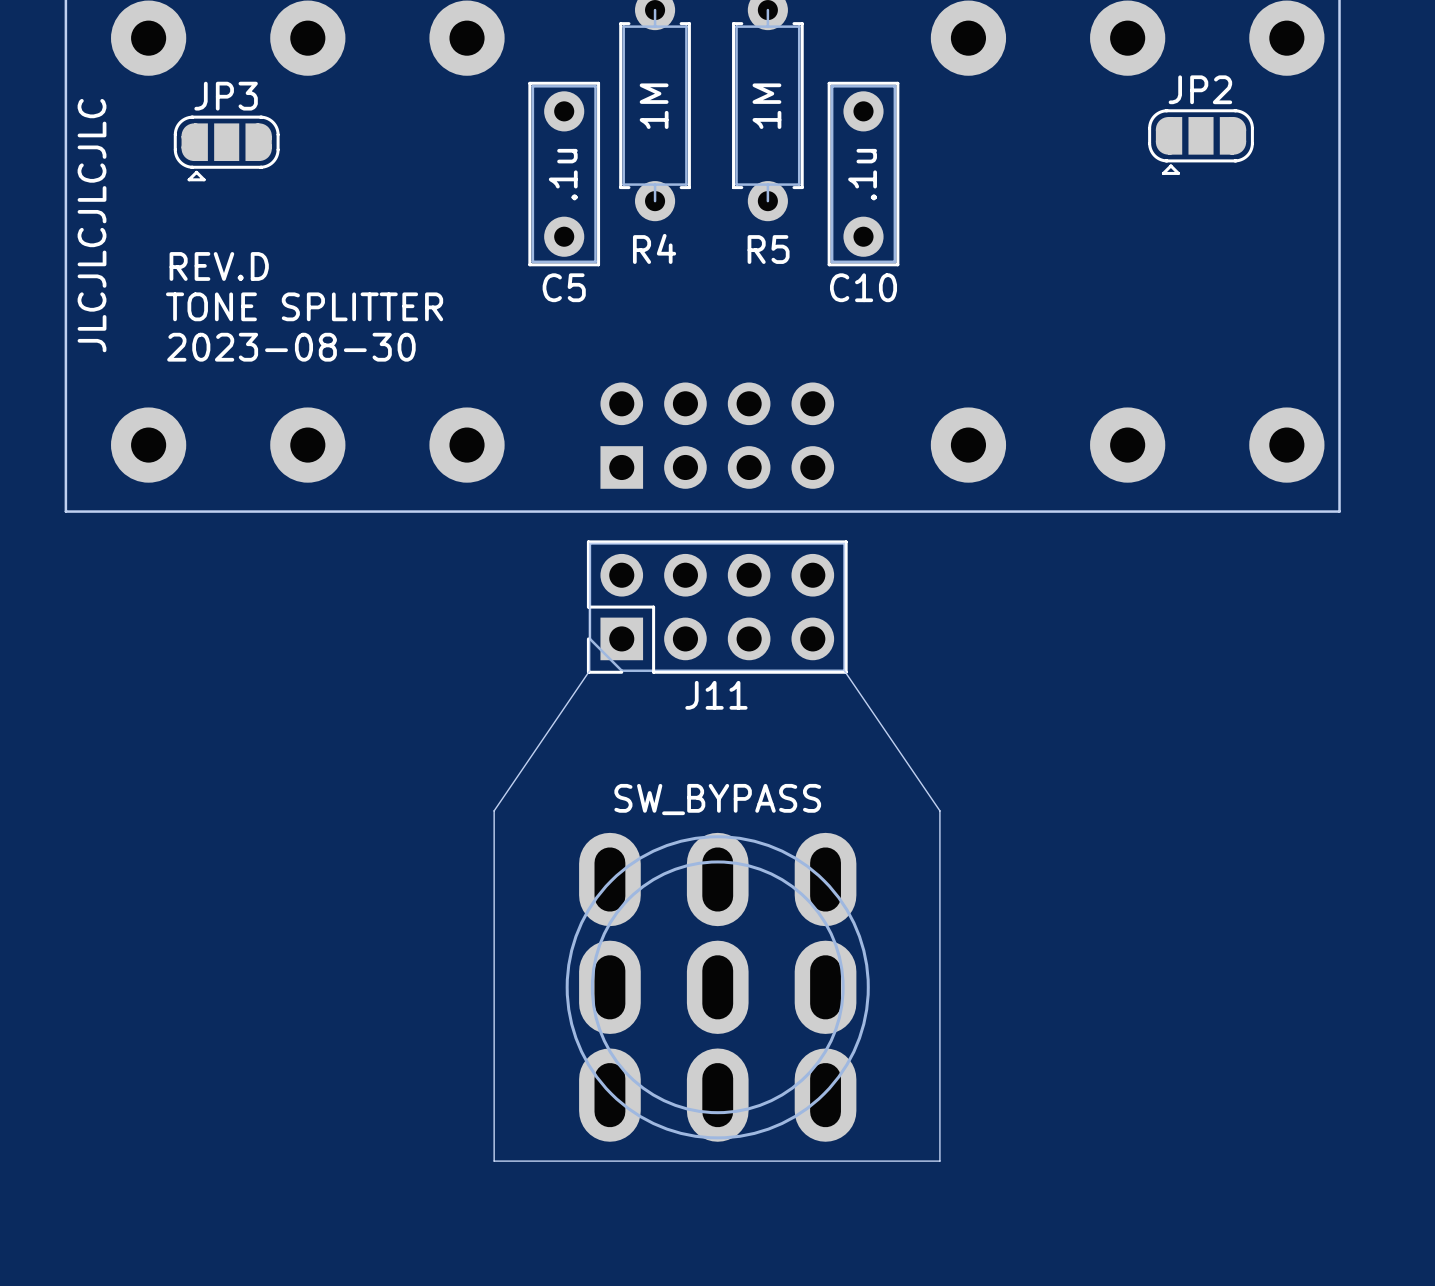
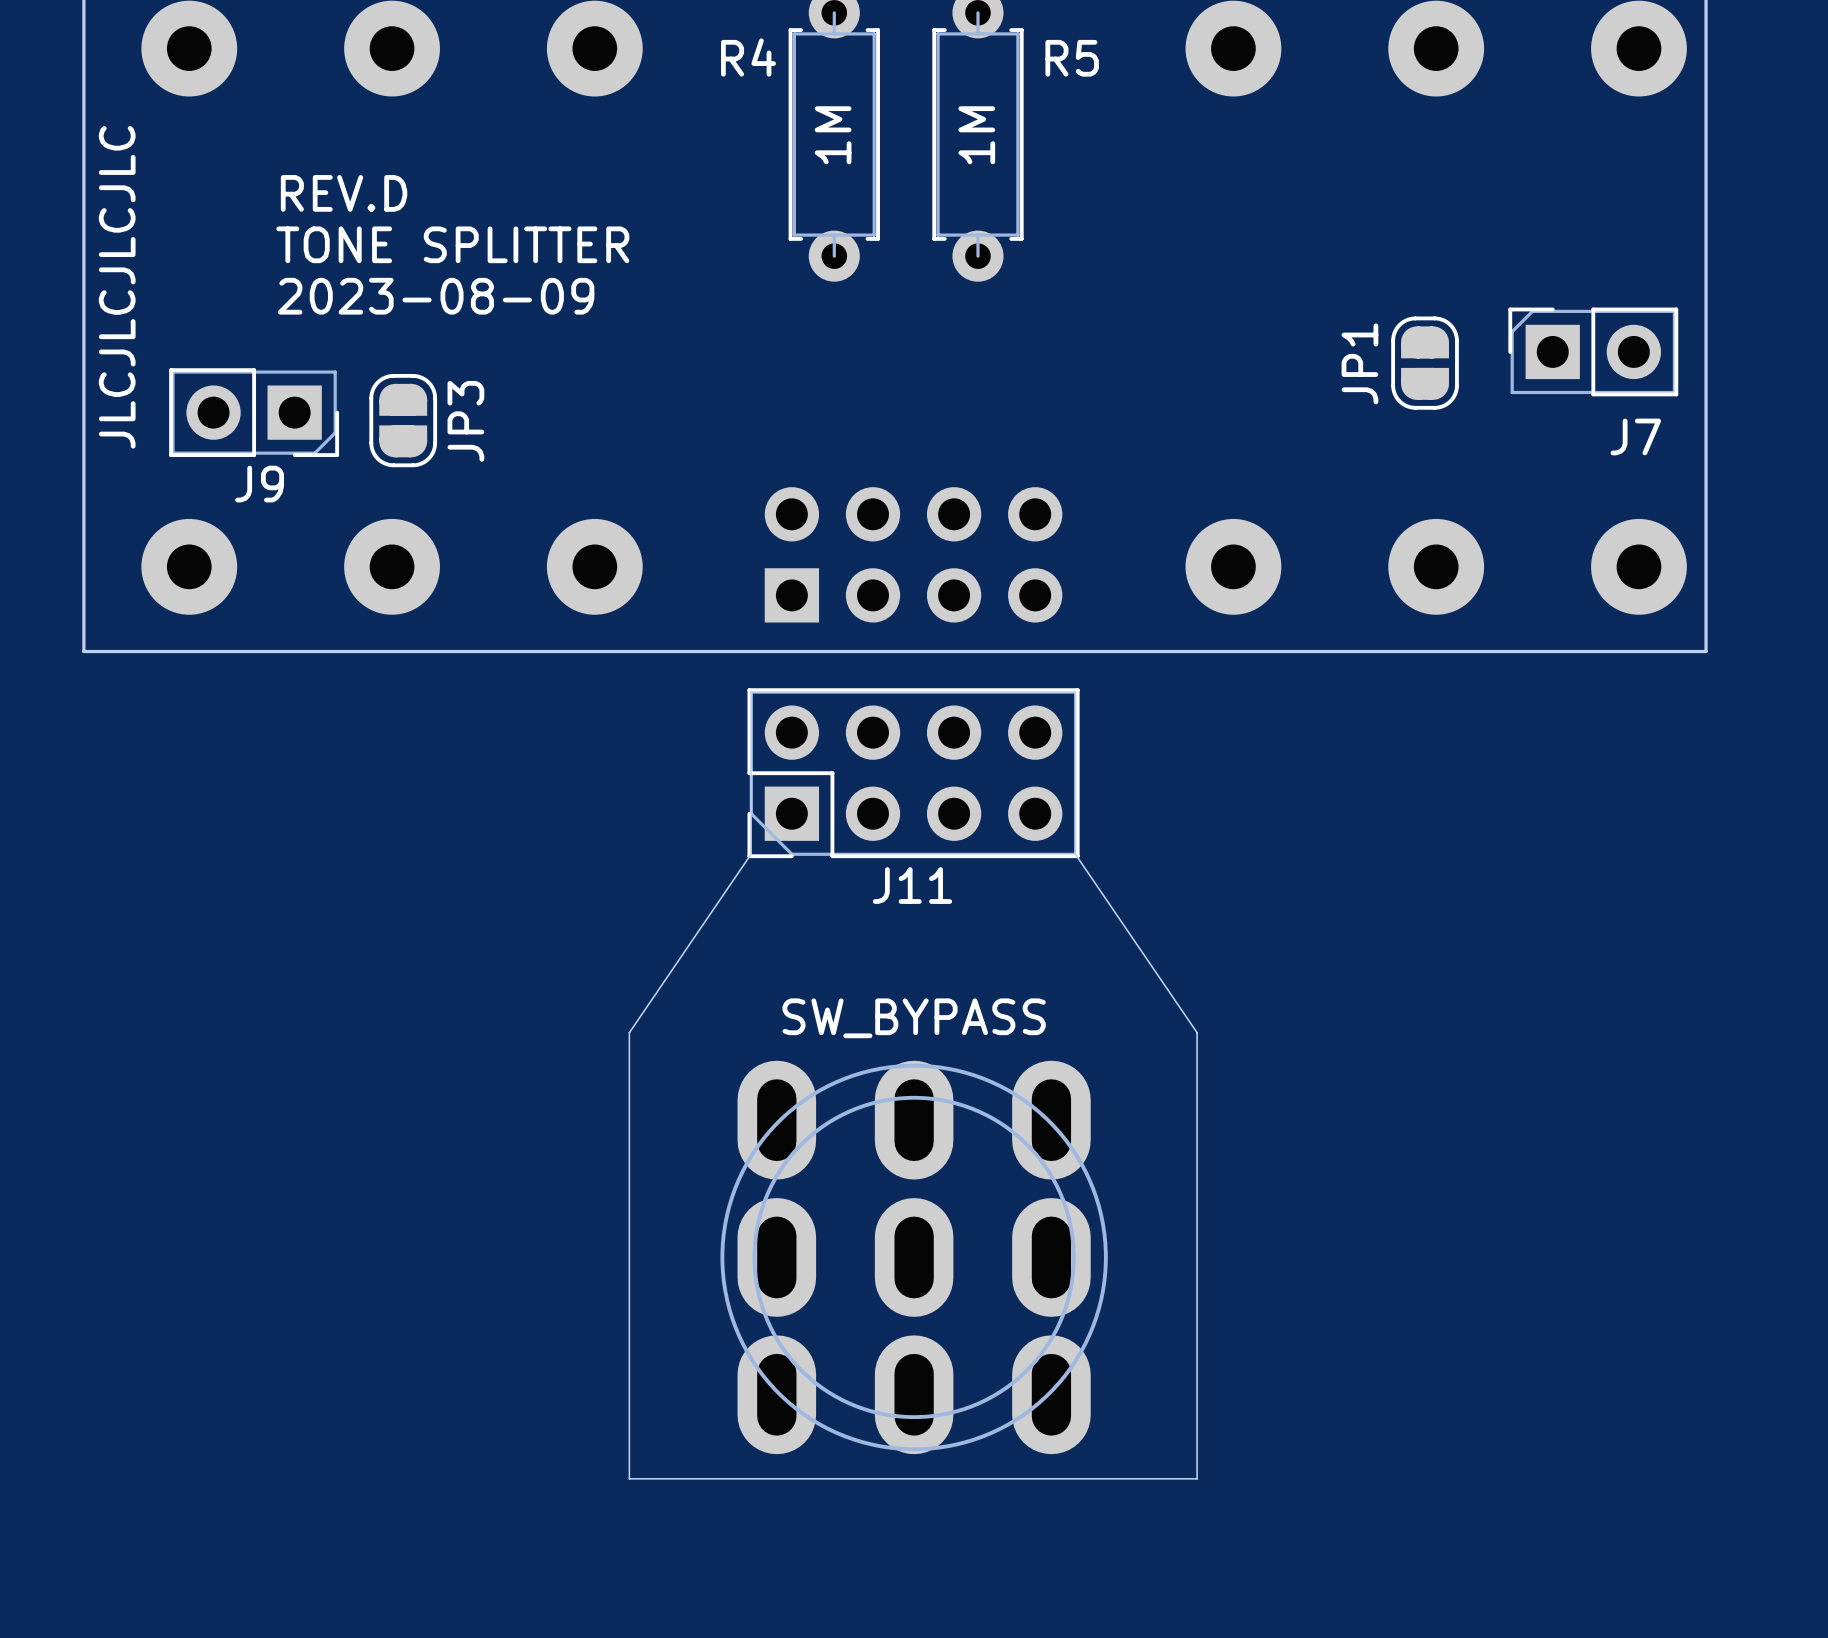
JP3 name position: JP3 (226, 96) -> JP3 (465, 421)
JP3 footprint: [173, 115, 280, 182] -> [369, 373, 438, 468]
JP2: (1201, 142) -> none
C5: .1u (564, 174) -> none
C10: .1u (863, 174) -> none
text: none -> 2023-08-09 (436, 296)
R4 name position: R4 (654, 248) -> R4 (748, 57)
R5 name position: R5 (768, 249) -> R5 (1072, 58)
text position: REV.D (219, 266) -> REV.D (344, 193)
J7: none -> (1593, 351)
JP1: none -> (1425, 363)
text position: TONE SPLITTER (304, 306) -> TONE SPLITTER (452, 244)
J9: none -> (254, 412)
text: 2023-08-30 (291, 347) -> none

